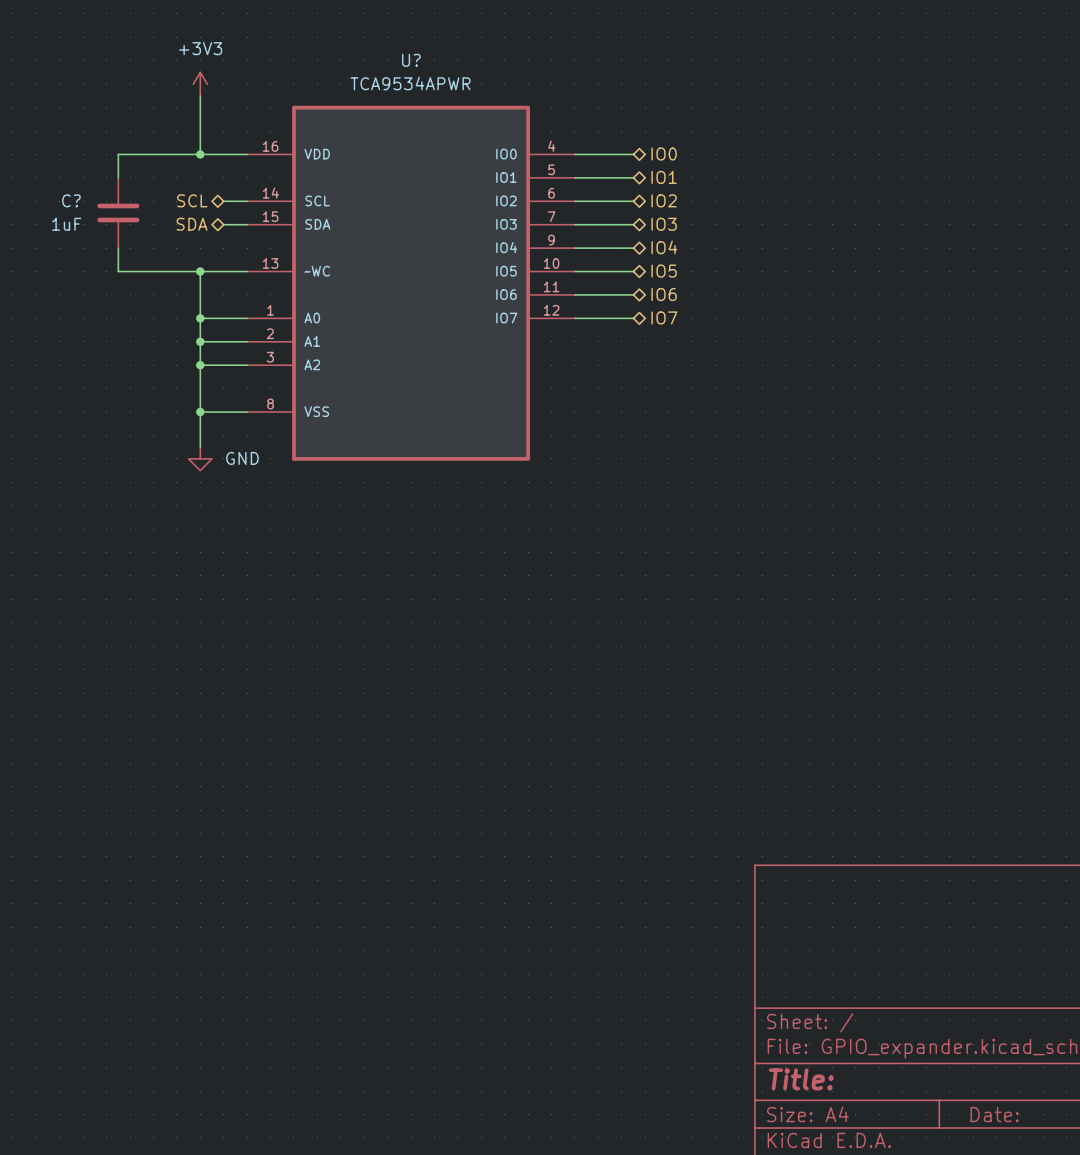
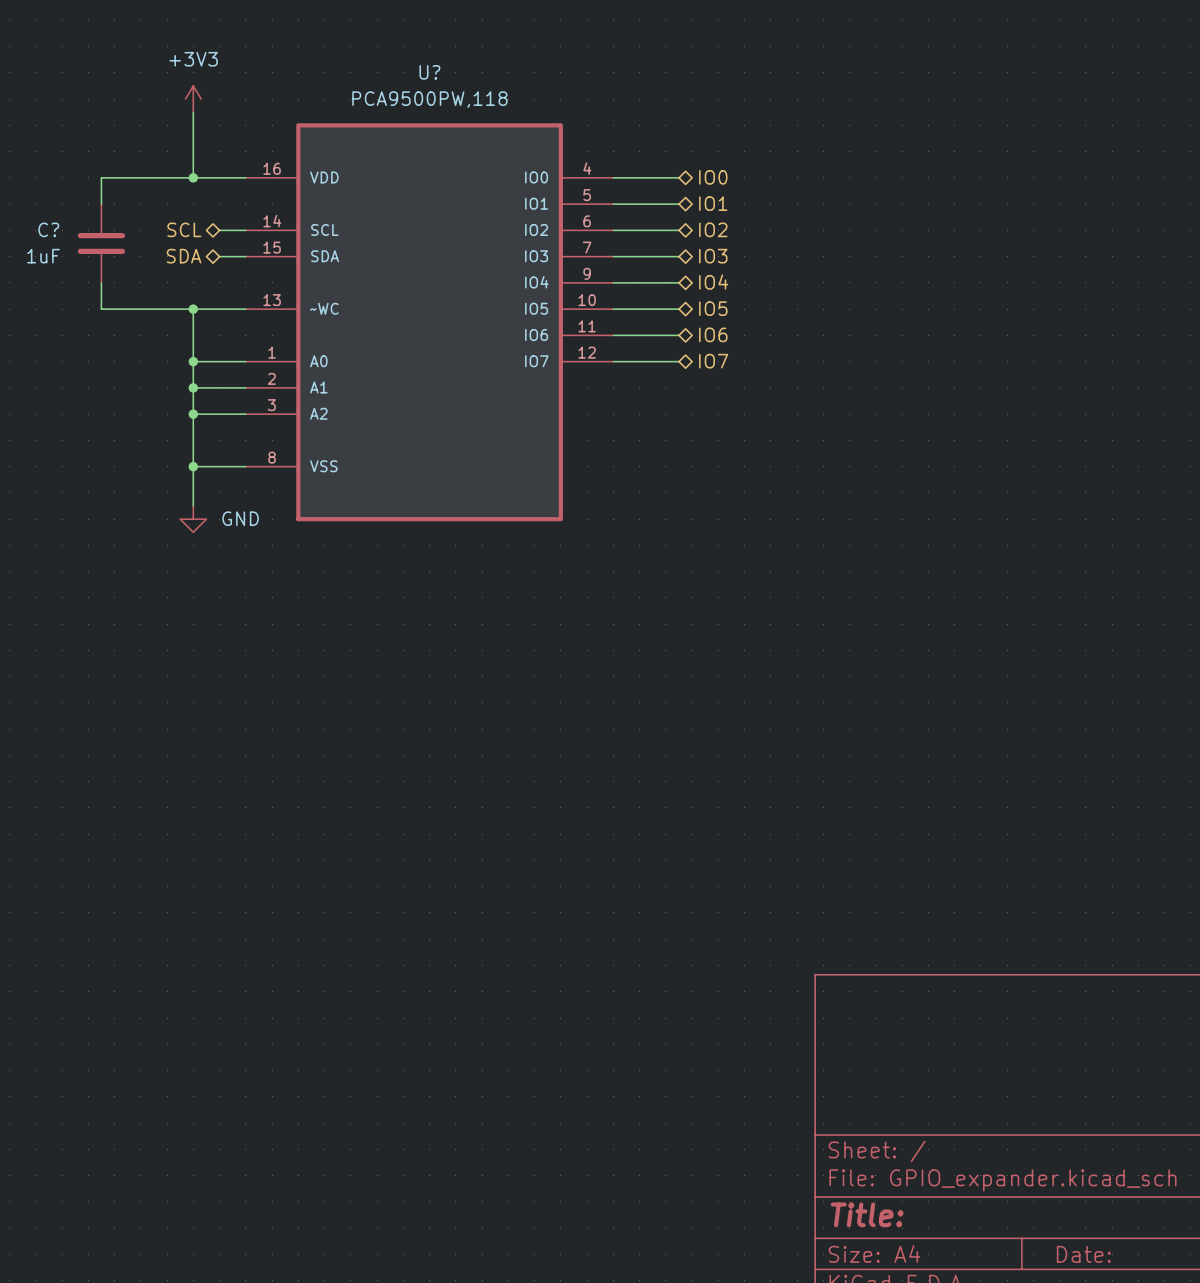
U? value: TCA9534APWR (410, 83) -> PCA9500PW,118 (429, 99)

